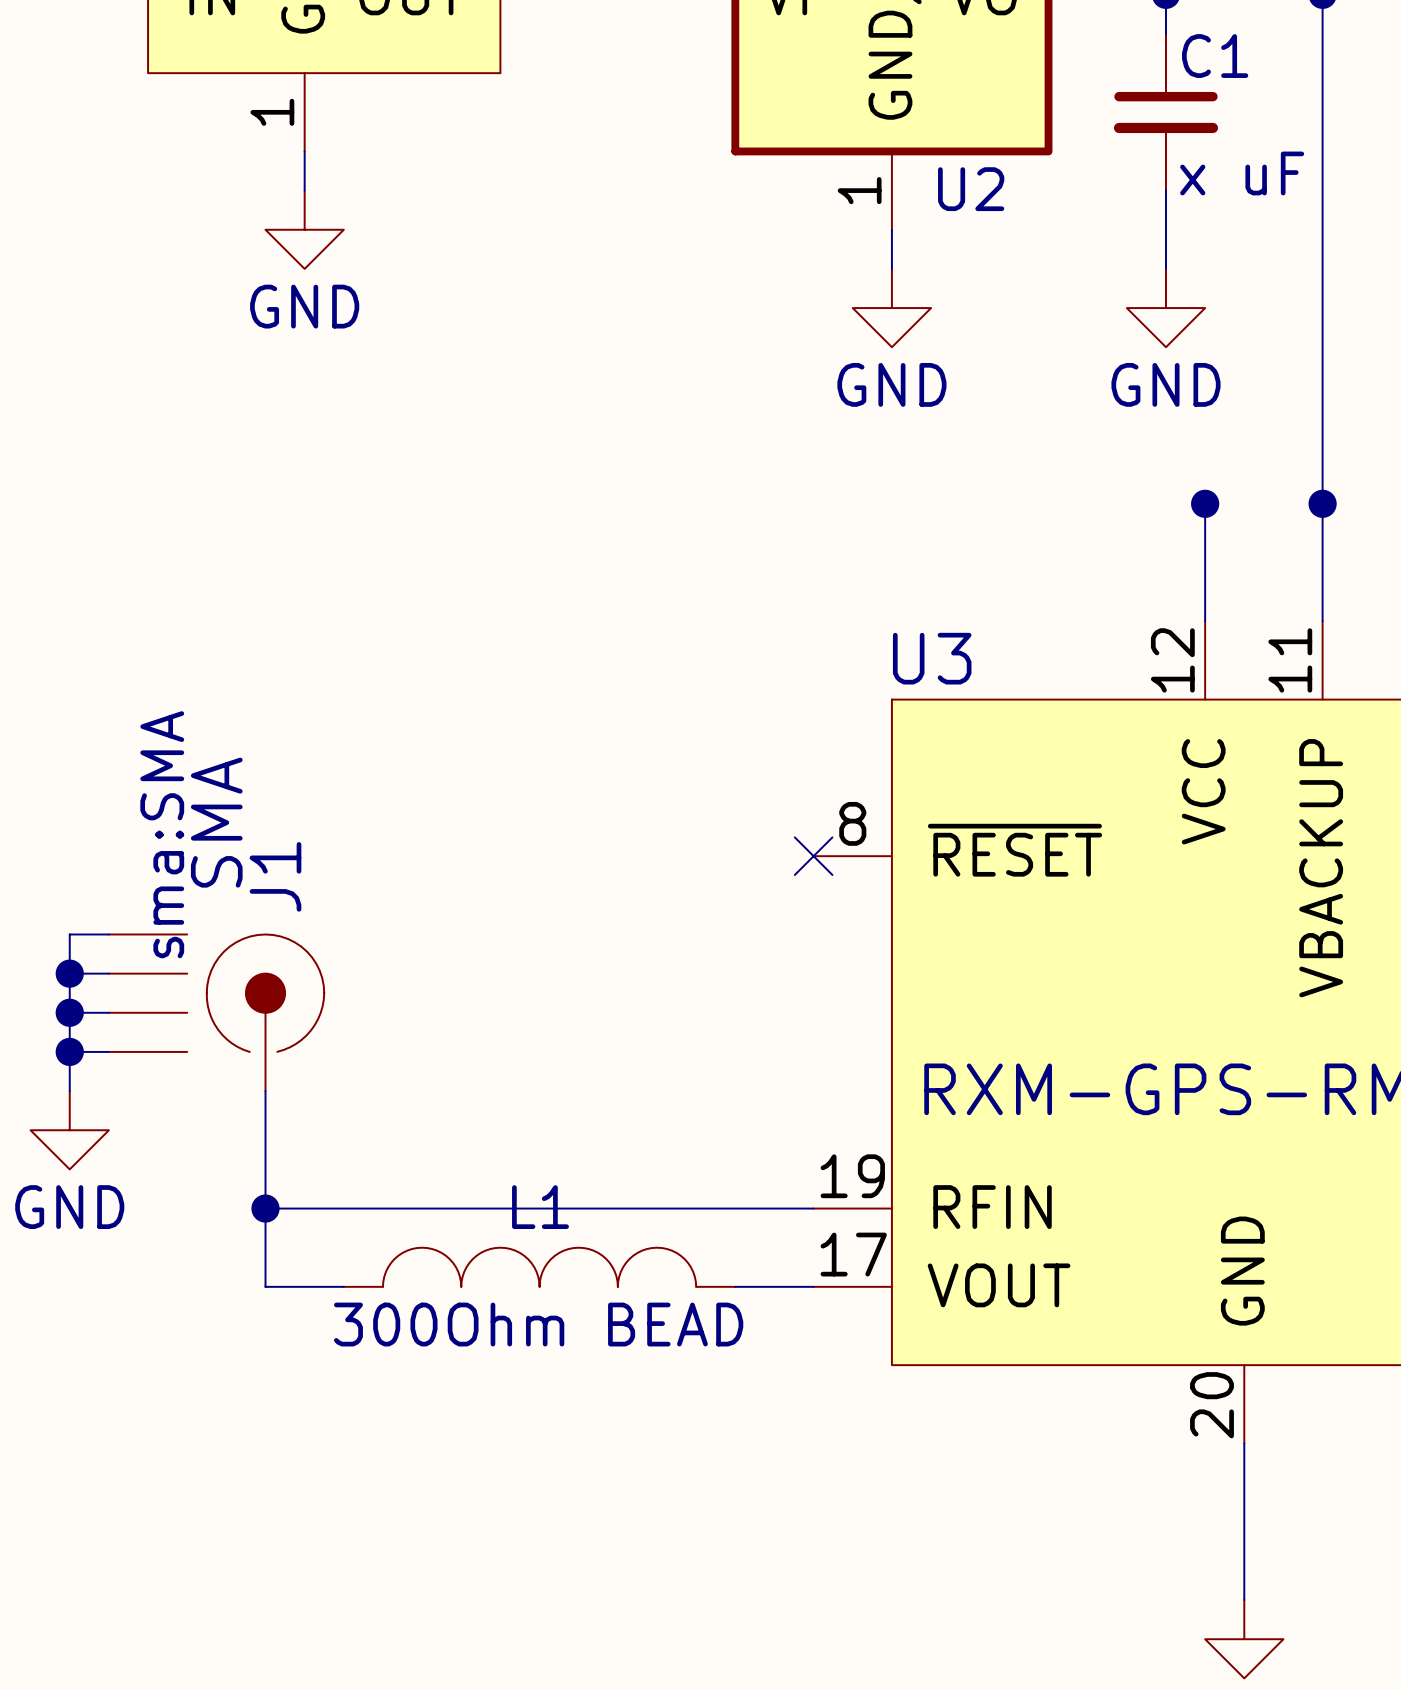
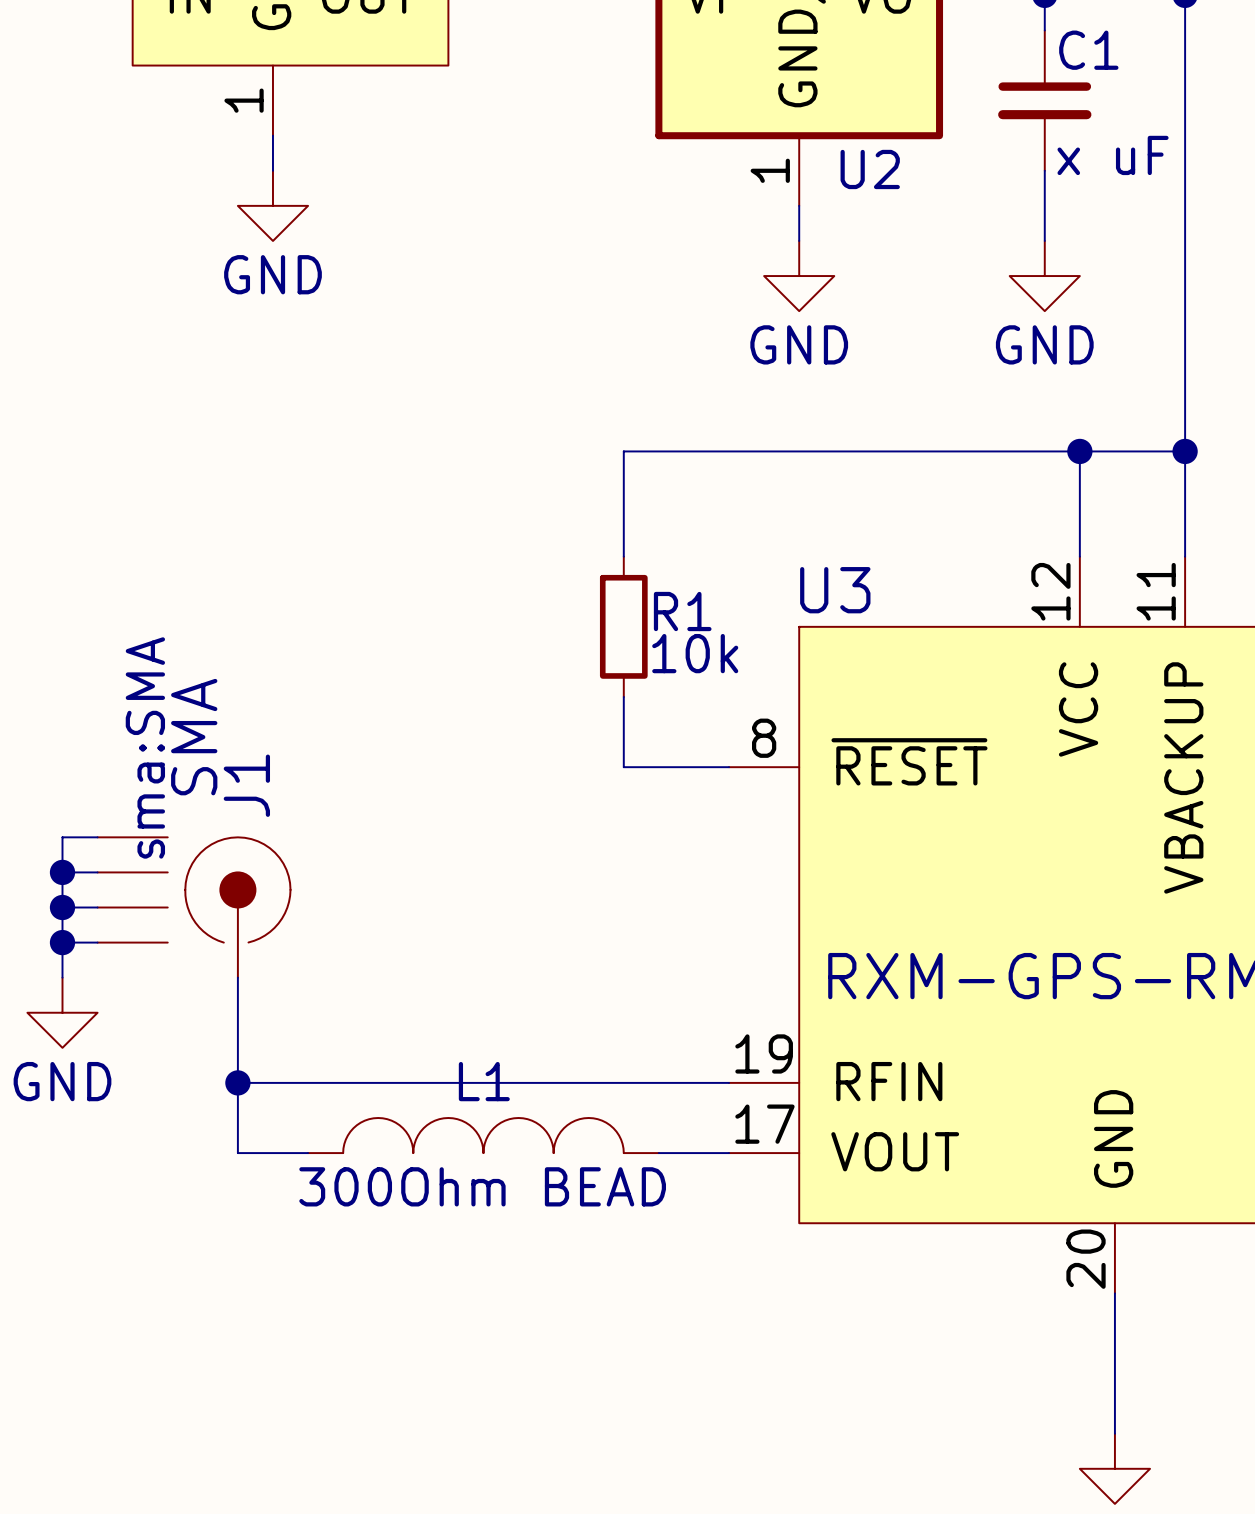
wire: none -> (1185, 451) (623, 451) (623, 556)
R1: none -> 10k (623, 626)
wire: none -> (623, 697) (623, 767) (729, 767)
no-connect mark: (813, 856) -> none

